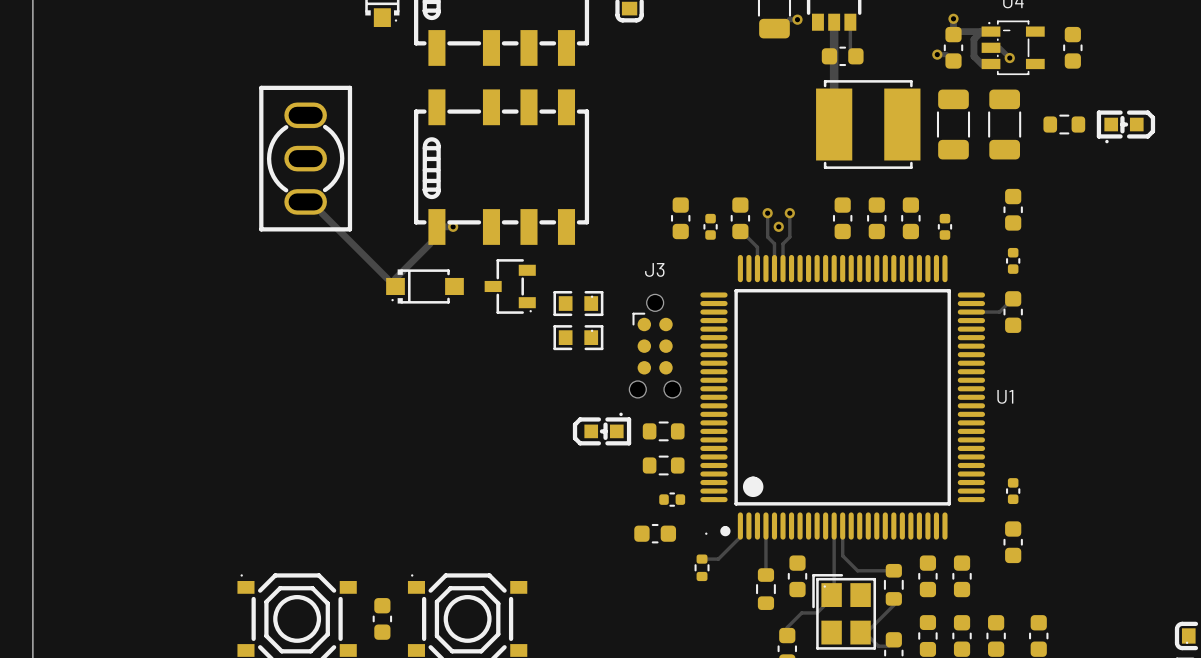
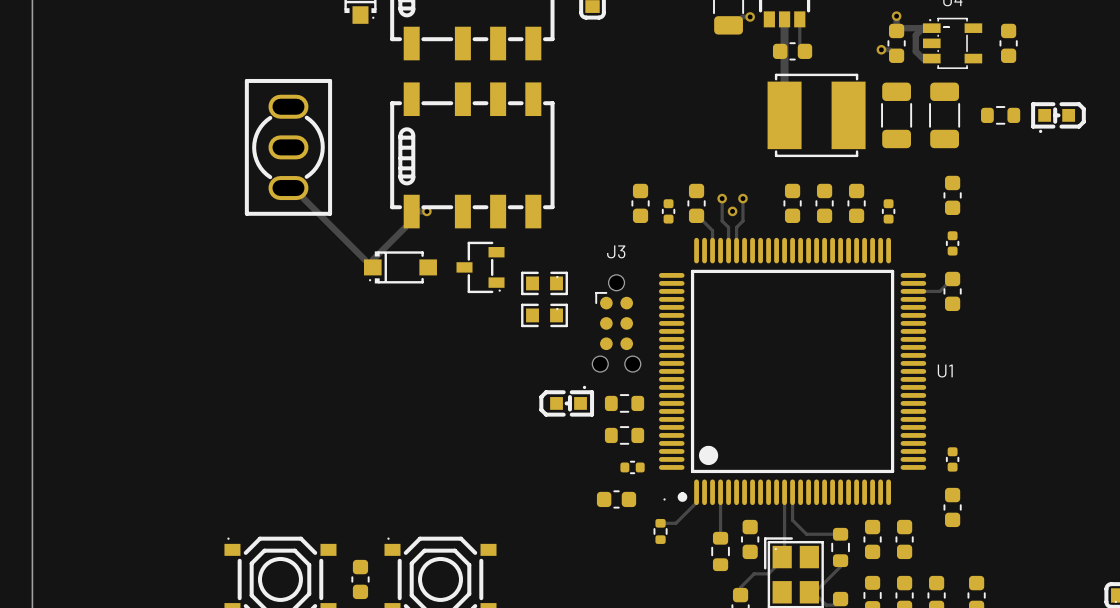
track: (999, 47) (1009, 58) -> none
via: (1009, 58) -> none

